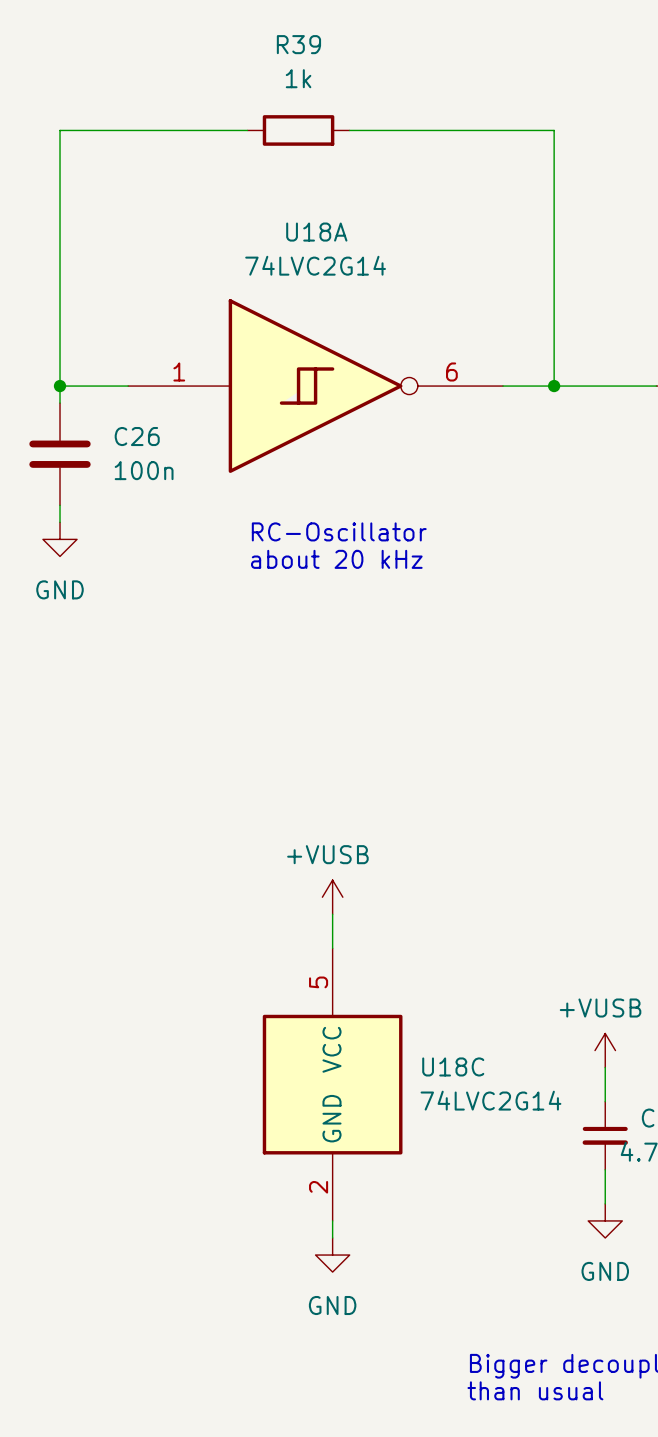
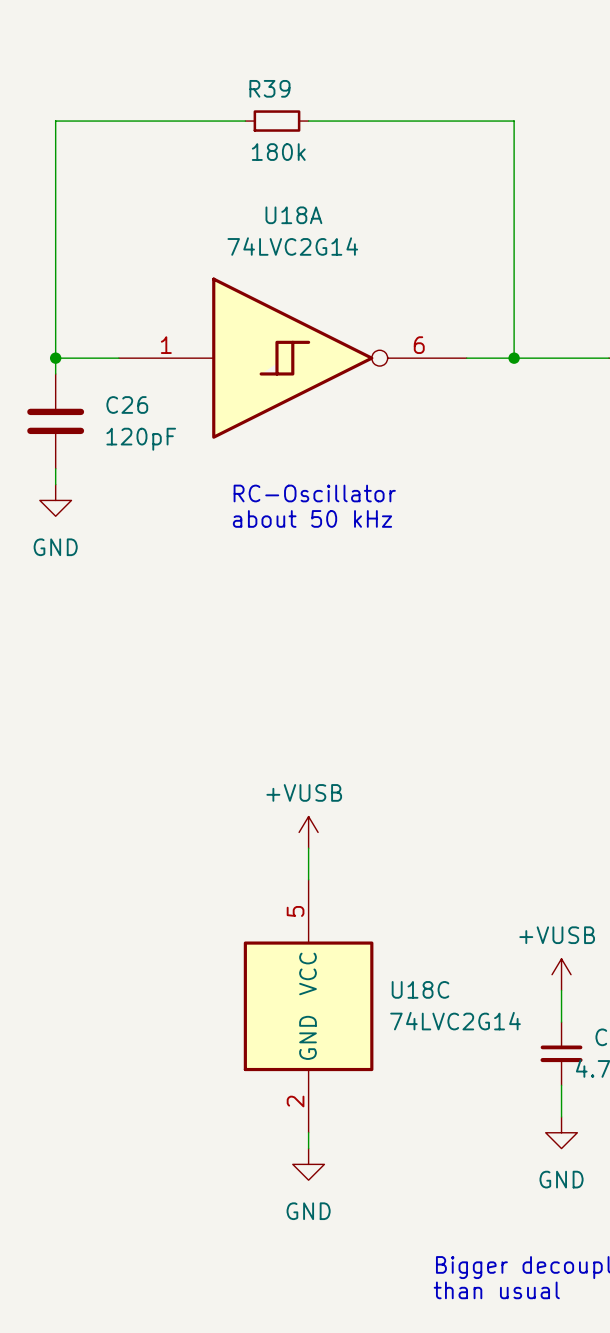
R39 name position: R39 (298, 44) -> R39 (269, 88)
R39 value: 1k (298, 78) -> 180k (278, 152)
R39 symbol: [247, 115, 350, 146] -> [245, 110, 309, 132]
C26 value: 100n (144, 470) -> 120pF (141, 439)
text: about 20 kHz (336, 559) -> about 50 kHz (312, 518)

